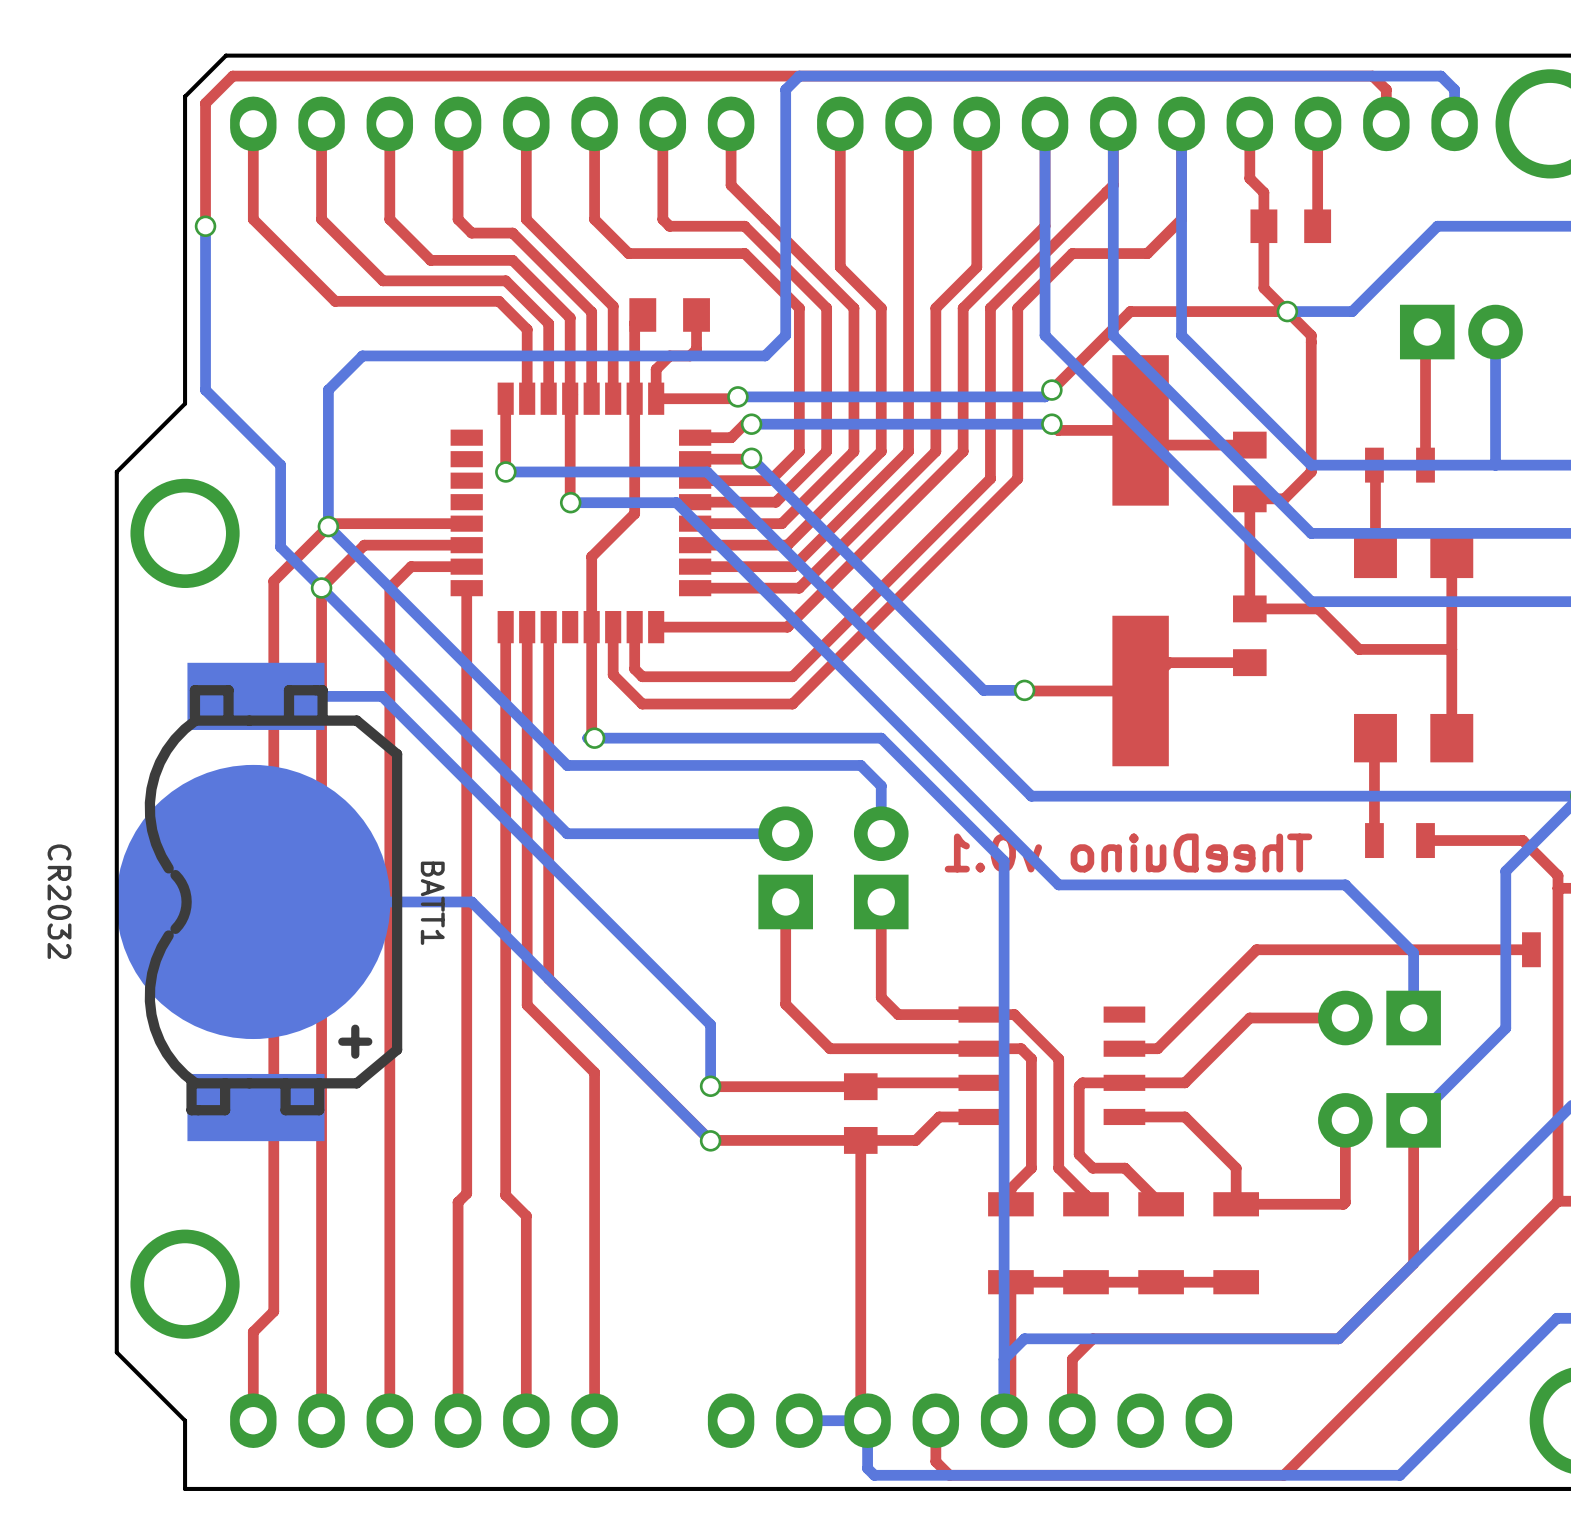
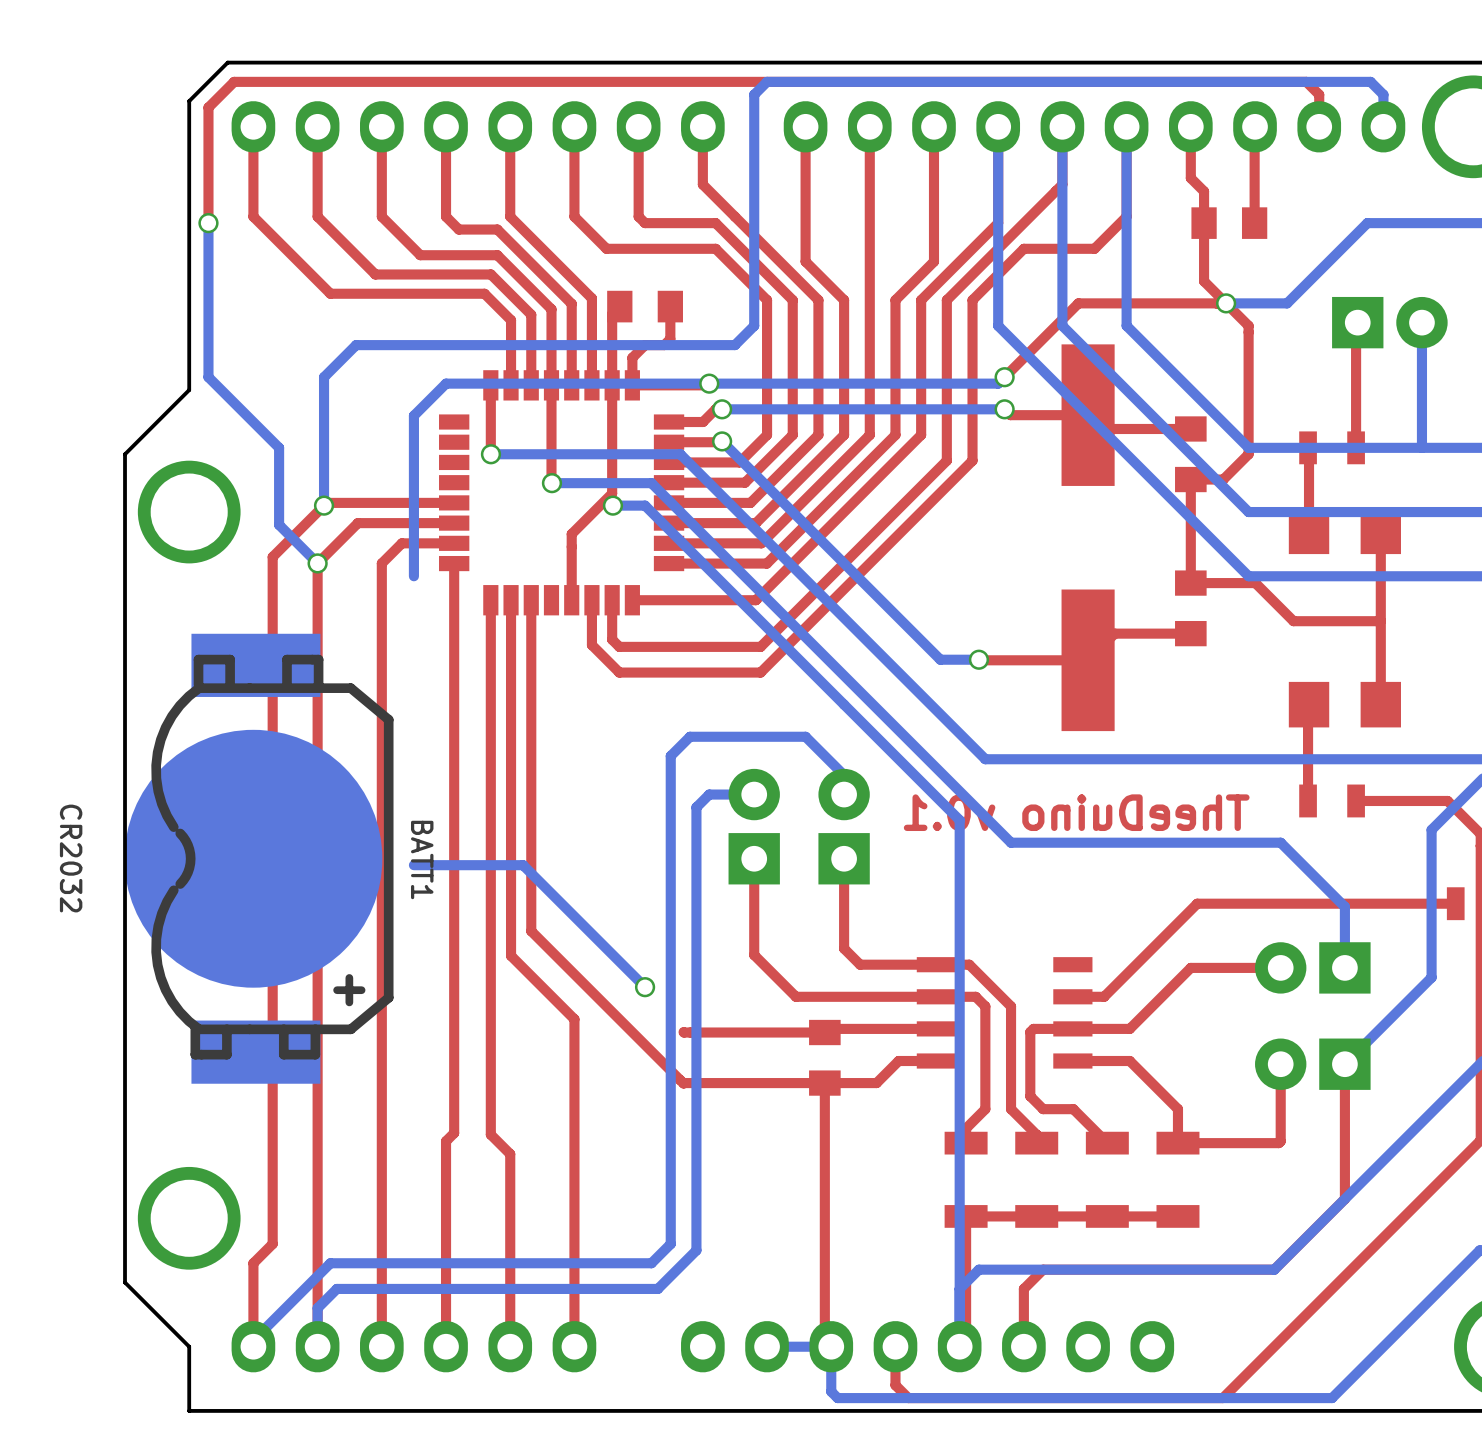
bottom track: none -> (709, 383) (446, 383) (413, 415) (413, 576)
bottom track: (328, 526) (567, 765) (860, 765) (881, 785) (881, 813) -> (253, 1346) (253, 1340) (330, 1263) (651, 1263) (670, 1243) (670, 756) (690, 736) (805, 736) (844, 775)
via: none -> (612, 505)
bottom track: (321, 588) (567, 833) (737, 833) -> (317, 1346) (317, 1308) (336, 1288) (657, 1288) (696, 1250) (696, 807) (709, 794)
top track: (591, 627) (591, 735) (594, 738) -> none
bottom track: (255, 696) (382, 696) (710, 1024) (710, 1086) -> none
via: (594, 738) -> none
bottom track: (881, 738) (587, 738) -> (844, 704) (645, 505) (612, 505)
bottom track: (253, 901) (471, 901) (710, 1140) -> none
bottom track: none -> (413, 865) (523, 865) (645, 987)
via: none -> (645, 987)
via: (710, 1086) -> none
via: (710, 1140) -> none

